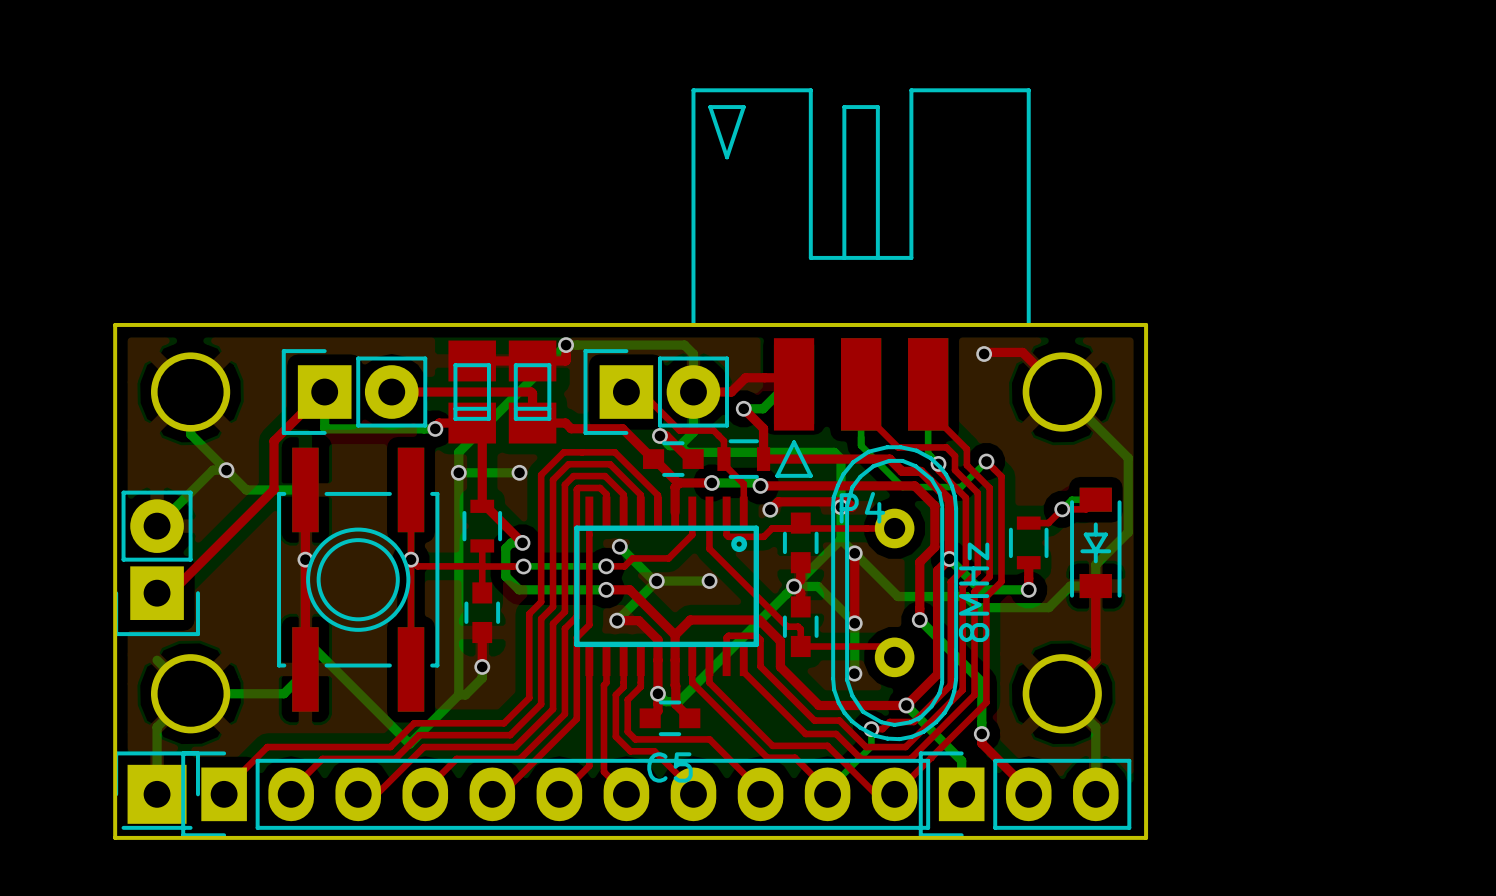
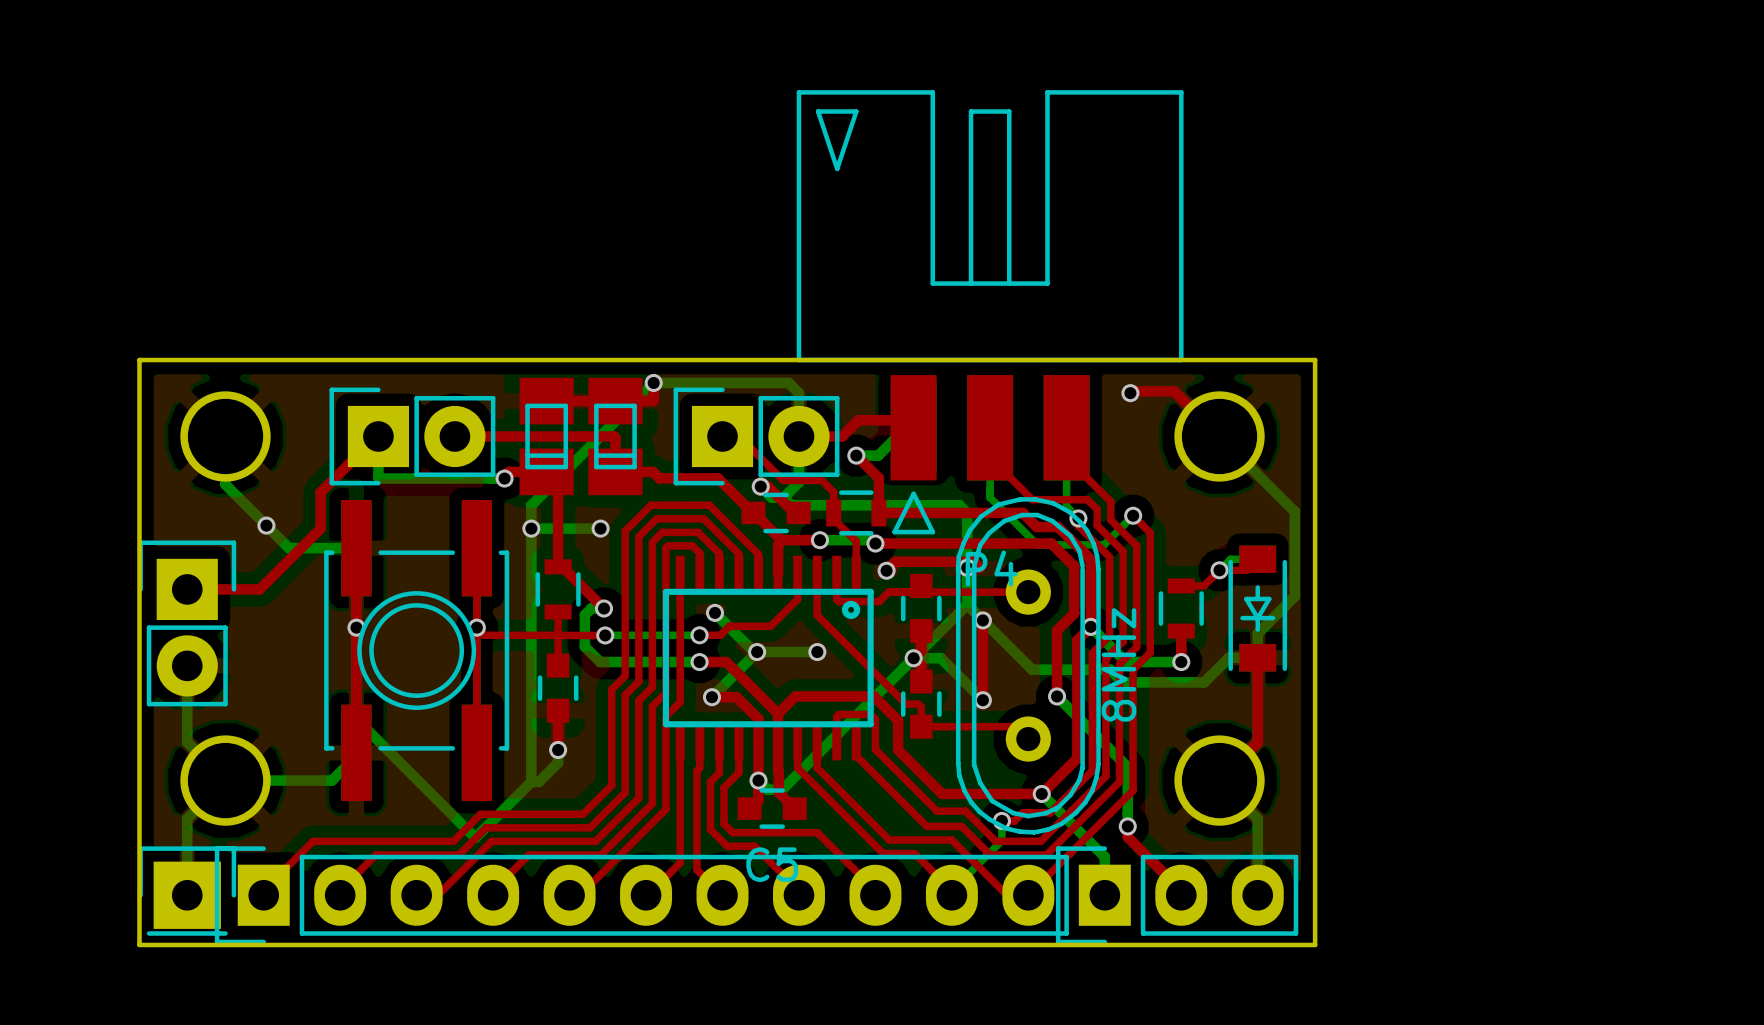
bottom track: (226, 470) (213, 470) (157, 526) -> none
top track: (274, 472) (274, 489) (170, 593) (157, 593) -> (320, 528) (259, 589) (187, 589)
part rotation: 0° (157, 563) -> 180° (187, 623)
bottom track: none -> (187, 665) (187, 742)
bottom track: (854, 623) (854, 673) -> none
via: (854, 673) -> none

